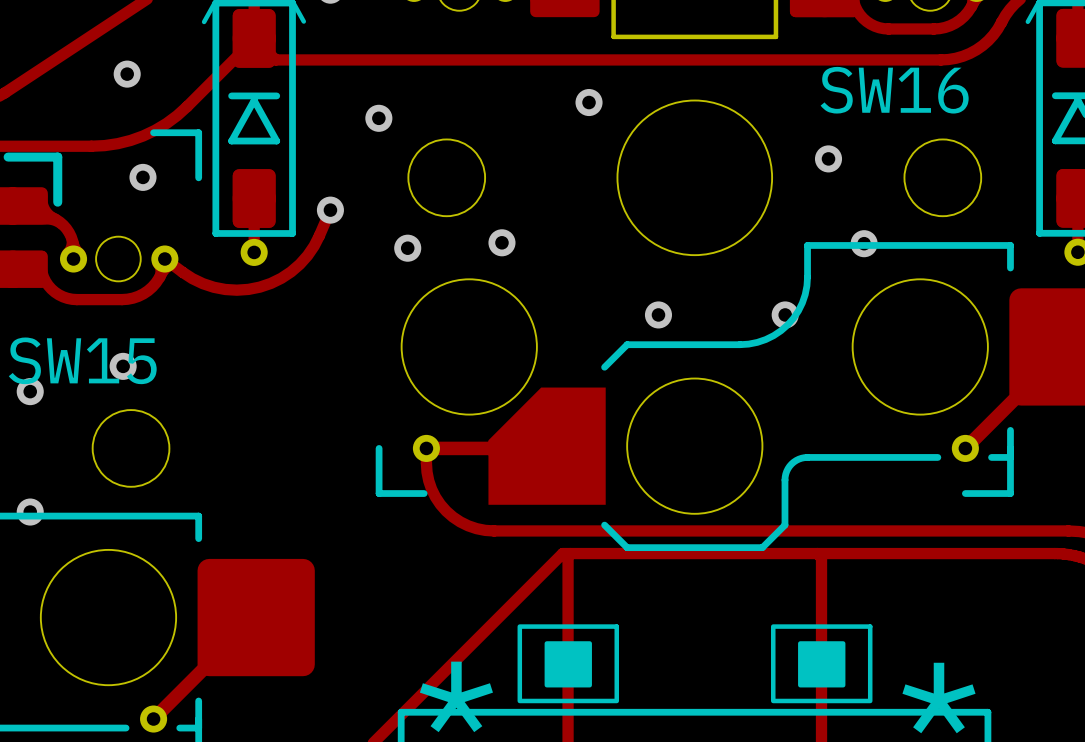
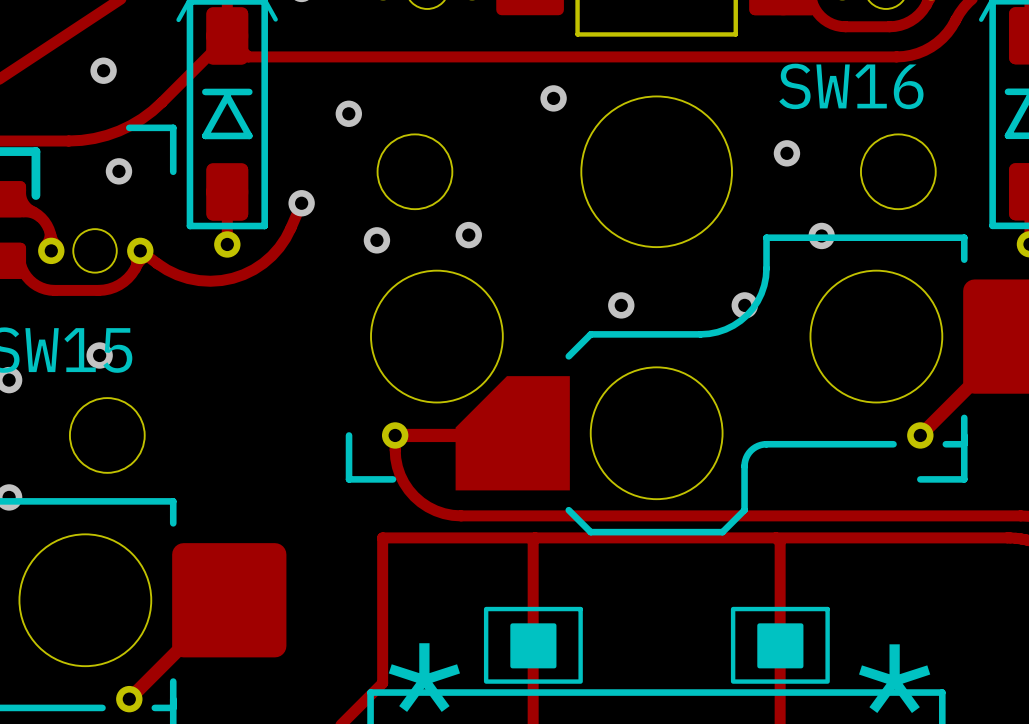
track: (562, 553) (413, 702) -> (527, 537) (382, 537) (382, 683)

